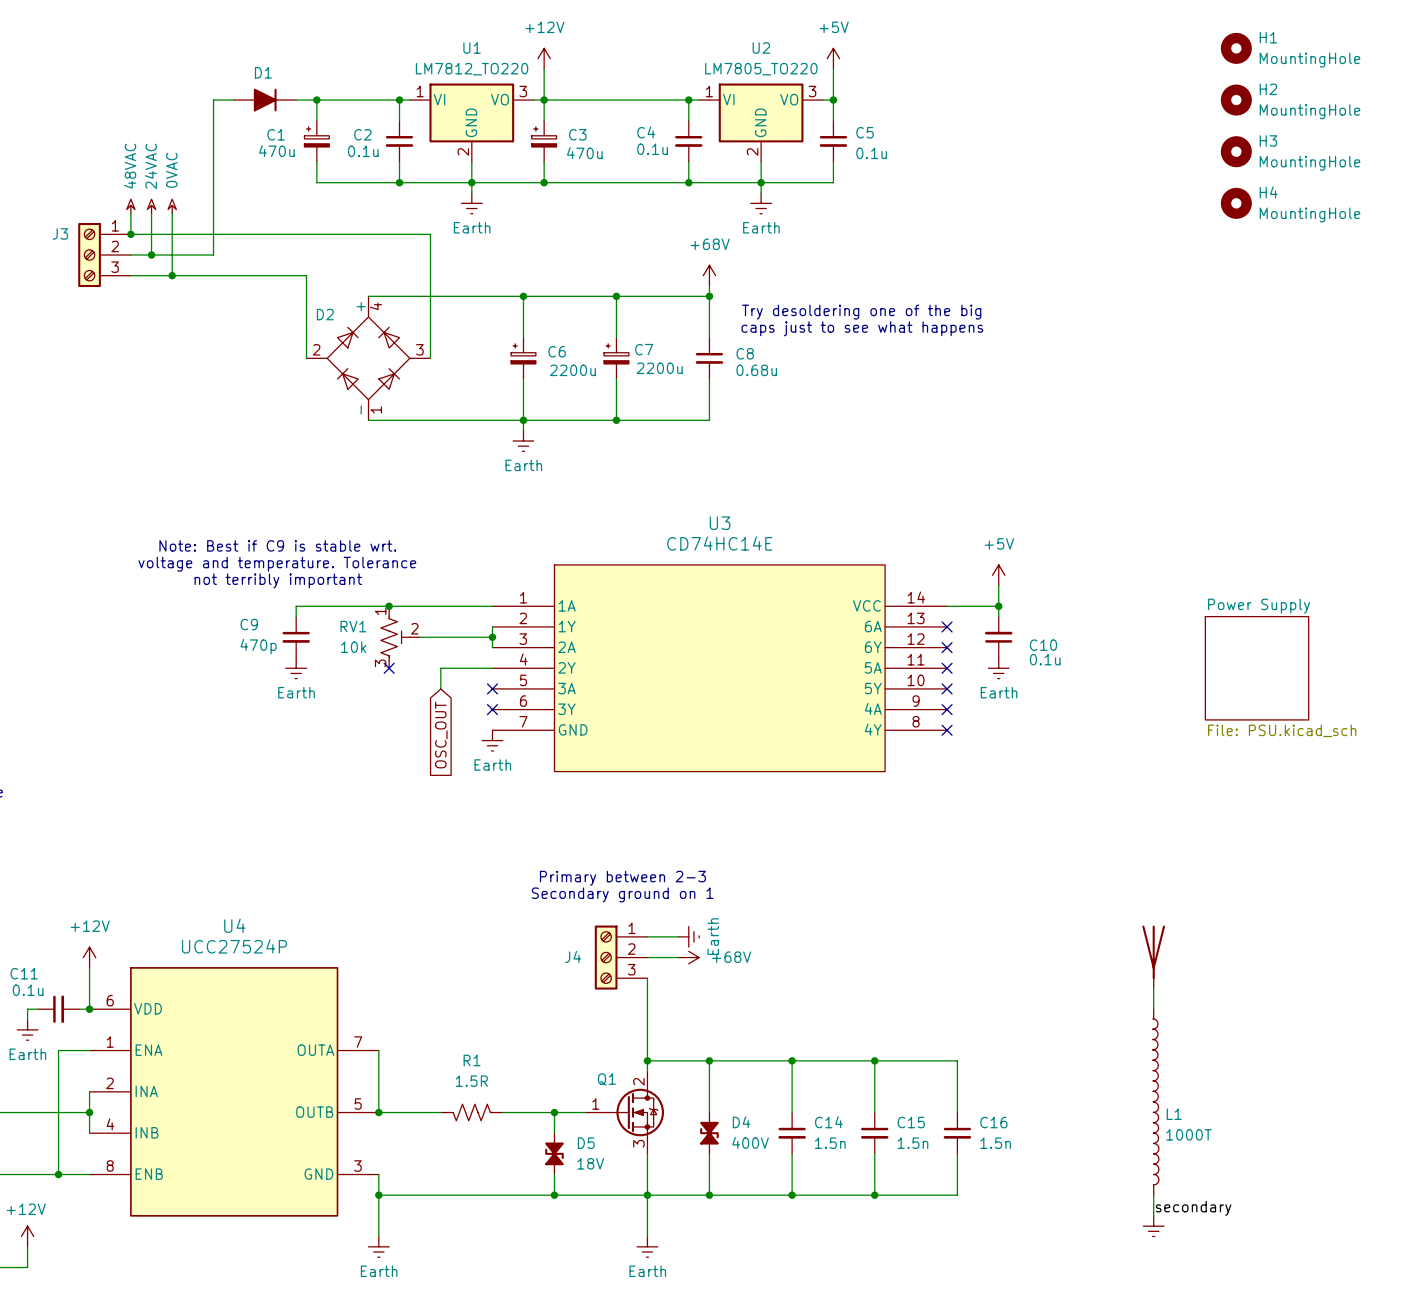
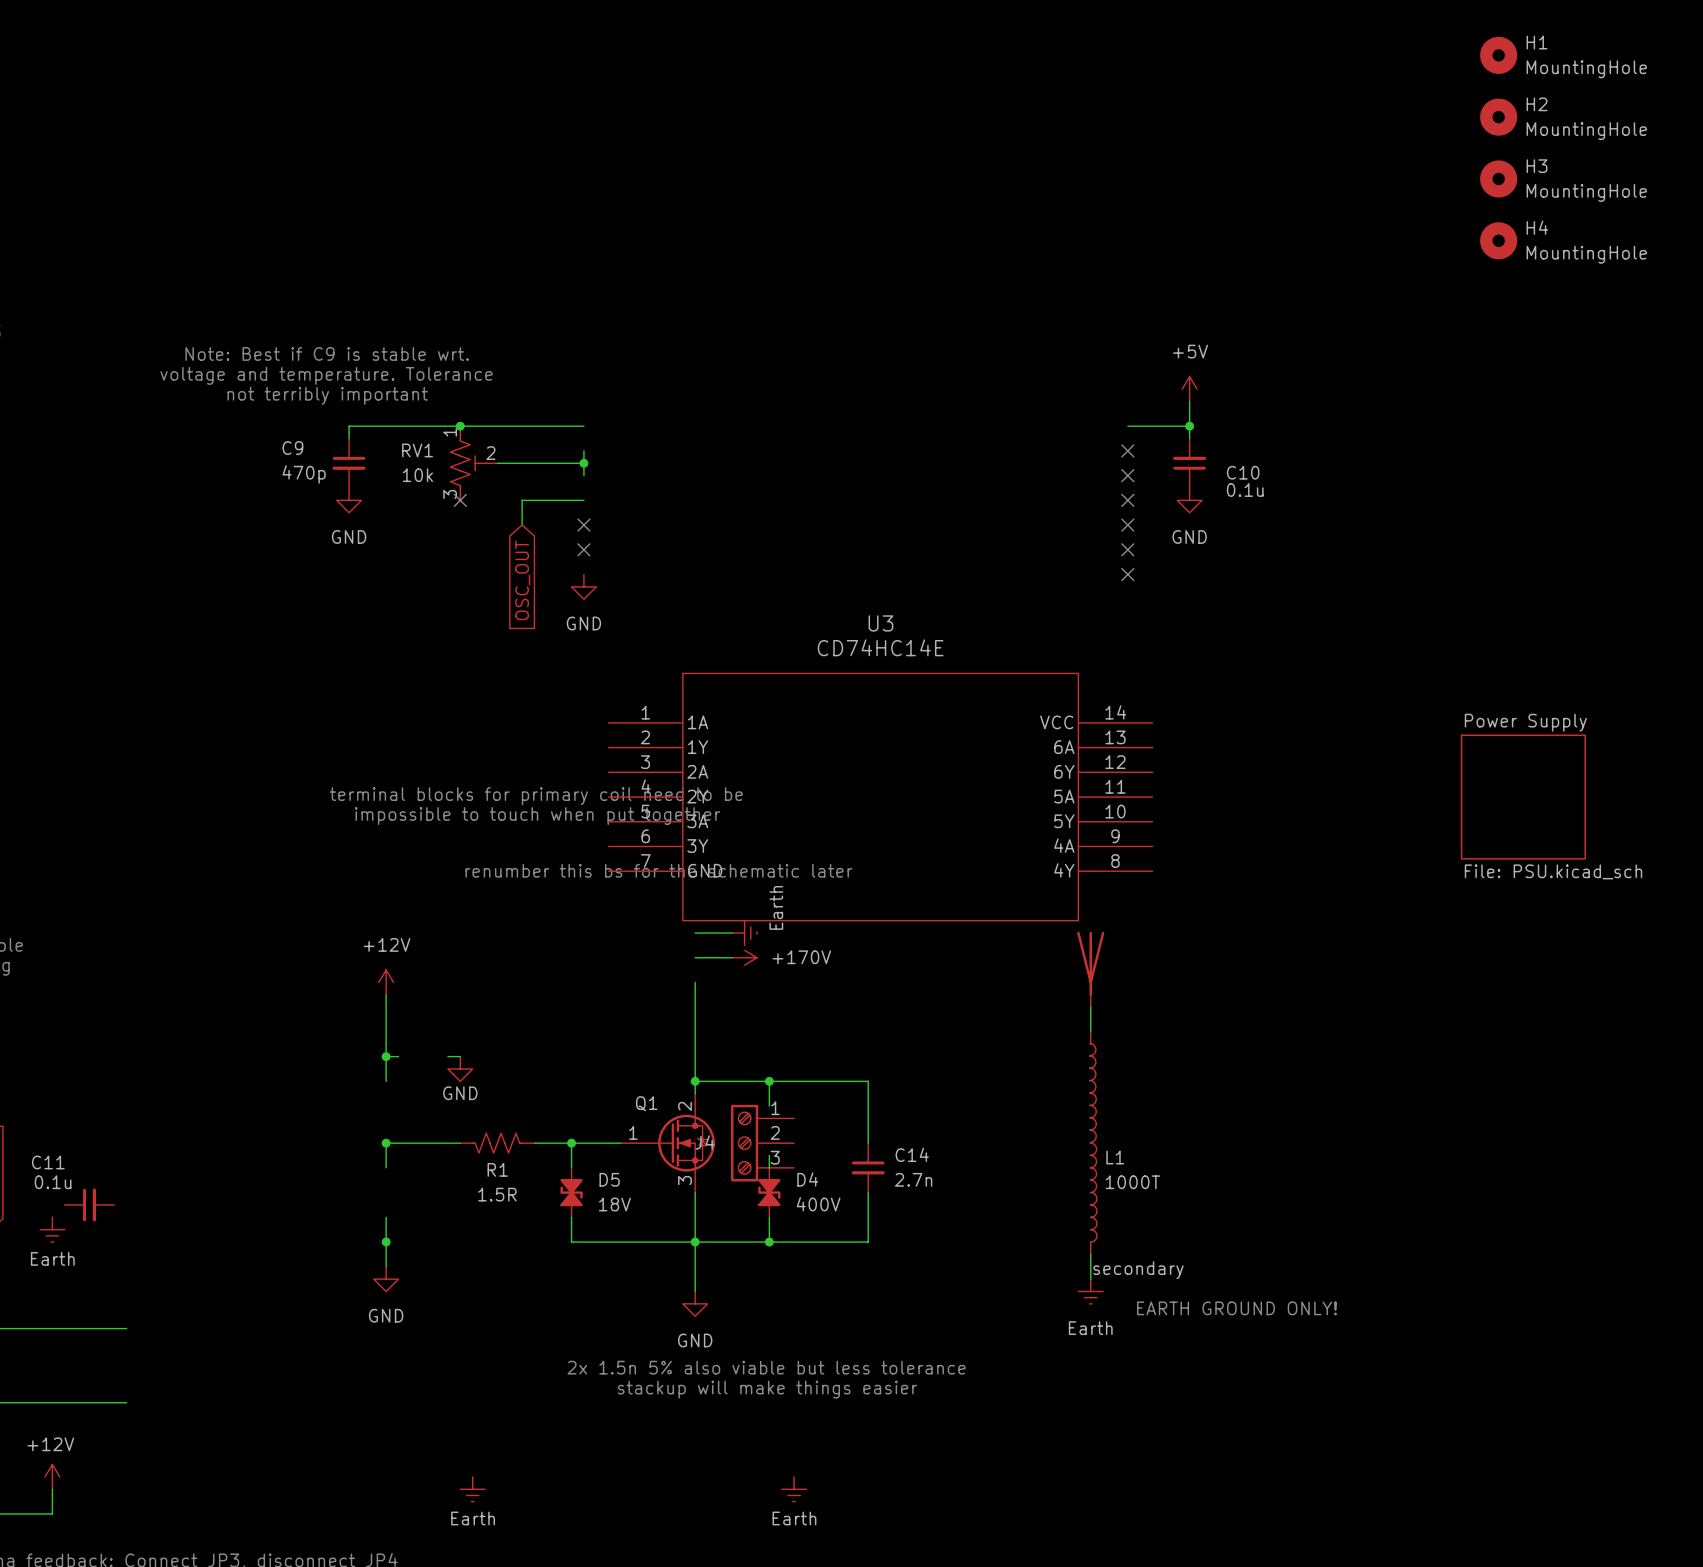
power symbol: +12V (544, 58) -> none
power symbol: +5V (833, 58) -> none
wire: (544, 69) (544, 120) -> none
wire: (833, 69) (833, 120) -> none
wire: (234, 100) (213, 100) (213, 255) (130, 255) -> none
D1: (265, 100) -> none
wire: (296, 100) (409, 100) -> none
wire: (316, 100) (316, 120) -> none
junction: (316, 100) -> none
wire: (399, 100) (399, 120) -> none
junction: (399, 100) -> none
wire: (533, 100) (699, 100) -> none
junction: (544, 100) -> none
wire: (688, 100) (688, 120) -> none
junction: (688, 100) -> none
wire: (823, 100) (833, 100) -> none
junction: (833, 100) -> none
U1: LM7812_TO220 (471, 122) -> none
U2: LM7805_TO220 (761, 122) -> none
C1: 470u (316, 141) -> none
C2: 0.1u (399, 141) -> none
C3: 470u (544, 141) -> none
C4: 0.1u (688, 141) -> none
C5: 0.1u (833, 141) -> none
wire: (316, 162) (316, 182) (833, 182) (833, 162) -> none
wire: (399, 162) (399, 182) -> none
wire: (471, 162) (471, 193) -> none
wire: (544, 162) (544, 182) -> none
wire: (688, 162) (688, 182) -> none
wire: (761, 162) (761, 193) -> none
junction: (399, 182) -> none
junction: (471, 182) -> none
junction: (544, 182) -> none
junction: (688, 182) -> none
junction: (761, 182) -> none
power symbol: Earth (471, 203) -> none
power symbol: Earth (761, 203) -> none
power symbol: 48VAC (130, 206) -> none
power symbol: 24VAC (151, 206) -> none
power symbol: 0VAC (172, 206) -> none
wire: (130, 213) (130, 234) (430, 234) (430, 358) -> none
wire: (151, 213) (151, 255) -> none
wire: (172, 213) (172, 275) -> none
junction: (130, 234) -> none
J3: (104, 255) -> none
junction: (151, 255) -> none
wire: (130, 275) (306, 275) (306, 358) -> none
junction: (172, 275) -> none
power symbol: +68V (709, 275) -> none
wire: (709, 286) (709, 337) -> none
wire: (368, 296) (709, 296) -> none
wire: (523, 296) (523, 337) -> none
junction: (523, 296) -> none
wire: (616, 296) (616, 337) -> none
junction: (616, 296) -> none
junction: (709, 296) -> none
text: none -> Note: Best if C9 is stable wrt. (327, 353)
text: Try desoldering one of the big (861, 312) -> none
text: none -> voltage and temperature. Tolerance (326, 375)
power symbol: none -> +5V (1189, 389)
text: caps just to see what happens (862, 328) -> none
text: none -> not terribly important (327, 395)
wire: none -> (1189, 401) (1189, 438)
junction: none -> (460, 426)
D2: (368, 358) -> none
wire: none -> (583, 426) (349, 426) (349, 438)
C6: 2200u (523, 358) -> none
C7: 2200u (616, 358) -> none
C8: 0.68u (709, 358) -> none
wire: none -> (1127, 426) (1189, 426)
junction: none -> (1189, 426)
wire: none -> (583, 450) (583, 475)
wire: (523, 378) (523, 430) -> none
wire: (616, 378) (616, 420) -> none
wire: (709, 378) (709, 420) (471, 420) -> none
no-connect mark: none -> (1127, 450)
wire: none -> (497, 463) (583, 463)
junction: none -> (583, 463)
no-connect mark: none -> (1127, 475)
power symbol: none -> GND (349, 500)
wire: (368, 420) (420, 420) -> (522, 525) (522, 500)
no-connect mark: none -> (460, 500)
junction: (523, 420) -> none
junction: (616, 420) -> none
no-connect mark: none -> (1127, 500)
power symbol: none -> GND (1189, 500)
no-connect mark: none -> (583, 525)
power symbol: Earth (523, 440) -> none
no-connect mark: none -> (1127, 525)
no-connect mark: none -> (583, 549)
no-connect mark: none -> (1127, 549)
no-connect mark: none -> (1127, 574)
global label: none -> OSC_OUT (522, 580)
power symbol: none -> GND (583, 586)
text: Note: Best if C9 is stable wrt. (277, 545) -> none
text: voltage and temperature. Tolerance (277, 564) -> none
power symbol: +5V (998, 575) -> none
text: not terribly important (278, 580) -> none
wire: (998, 585) (998, 616) -> none
junction: (389, 606) -> none
wire: (492, 606) (296, 606) (296, 616) -> none
wire: (947, 606) (998, 606) -> none
junction: (998, 606) -> none
wire: (492, 626) (492, 647) -> none
no-connect mark: (947, 626) -> none
C9 position: (296, 637) -> (349, 463)
RV1 position: (400, 637) -> (473, 463)
wire: (420, 637) (492, 637) -> none
junction: (492, 637) -> none
C10 position: (998, 637) -> (1189, 463)
no-connect mark: (947, 647) -> none
text: none -> terminal blocks for primary coil need to be (536, 796)
power symbol: Earth (296, 668) -> none
no-connect mark: (389, 668) -> none
wire: (492, 668) (440, 668) (440, 688) -> none
no-connect mark: (947, 668) -> none
power symbol: Earth (998, 668) -> none
text: none -> impossible to touch when put together (537, 816)
no-connect mark: (492, 688) -> none
no-connect mark: (947, 688) -> none
no-connect mark: (492, 709) -> none
no-connect mark: (947, 709) -> none
text: none -> renumber this bs for the schematic later (658, 870)
no-connect mark: (947, 730) -> none
global label: OSC_OUT (441, 735) -> none
power symbol: Earth (492, 740) -> none
power symbol: none -> Earth (744, 933)
power symbol: none -> +170V (744, 957)
part: none -> (1090, 969)
power symbol: none -> +12V (386, 982)
wire: none -> (386, 994) (386, 1081)
wire: none -> (1090, 1007) (1090, 1031)
text: Primary between 2-3 (622, 878) -> none
wire: none -> (386, 1056) (398, 1056)
junction: none -> (386, 1056)
wire: none -> (447, 1056) (460, 1056)
text: Secondary ground on 1 (622, 894) -> none
power symbol: none -> GND (460, 1068)
wire: none -> (695, 1081) (868, 1081) (868, 1143)
junction: none -> (695, 1081)
wire: none -> (769, 1081) (769, 1106)
junction: none -> (769, 1081)
wire: (647, 936) (678, 936) -> (695, 933) (732, 933)
power symbol: Earth (688, 936) -> none
power symbol: +12V (89, 957) -> none
junction: none -> (386, 1143)
wire: none -> (460, 1143) (386, 1143) (386, 1167)
wire: none -> (534, 1143) (621, 1143)
wire: none -> (571, 1143) (571, 1167)
junction: none -> (571, 1143)
wire: (647, 957) (678, 957) -> (695, 957) (732, 957)
power symbol: +68V (688, 957) -> none
part: (1153, 957) -> none
wire: (89, 967) (89, 1009) (79, 1009) -> none
wire: none -> (769, 1155) (769, 1167)
wire: (647, 978) (647, 1071) -> (695, 982) (695, 1093)
wire: (1153, 988) (1153, 1009) -> none
wire: none -> (868, 1192) (868, 1242) (571, 1242) (571, 1217)
wire: (37, 1009) (27, 1009) (27, 1019) -> none
junction: (89, 1009) -> none
junction: none -> (386, 1242)
junction: none -> (695, 1242)
wire: (89, 1050) (58, 1050) (58, 1174) -> none
wire: (378, 1050) (378, 1112) (440, 1112) -> none
wire: none -> (1090, 1254) (1090, 1279)
R1 name position: R1 (472, 1060) -> R1 (497, 1169)
wire: (647, 1060) (957, 1060) (957, 1112) -> none
junction position: (647, 1060) -> (769, 1242)
wire: (709, 1060) (709, 1112) -> none
junction: (709, 1060) -> none
wire: (792, 1060) (792, 1112) -> none
junction: (792, 1060) -> none
wire: (874, 1060) (874, 1112) -> none
junction: (874, 1060) -> none
label: none -> secondary (1138, 1270)
power symbol: none -> GND (386, 1279)
R1 value position: 1.5R (471, 1081) -> 1.5R (497, 1194)
power symbol: none -> Earth (1090, 1291)
wire: (89, 1091) (89, 1133) -> none
U4: UCC27524P (234, 1091) -> none
power symbol: none -> GND (695, 1303)
text: none -> EARTH GROUND ONLY! (1236, 1308)
L1 position: (1155, 1102) -> (1093, 1143)
junction: (89, 1112) -> none
junction: (378, 1112) -> none
R1 position: (471, 1112) -> (497, 1143)
wire: (502, 1112) (585, 1112) -> none
wire: (554, 1112) (554, 1133) -> (769, 1217) (769, 1242)
junction: (554, 1112) -> none
Q1 position: (624, 1112) -> (667, 1143)
D4 position: (709, 1133) -> (769, 1192)
C14 position: (792, 1133) -> (868, 1167)
C15: 1.5n (874, 1133) -> none
C16: 1.5n (957, 1133) -> none
C14 value: 1.5n (830, 1143) -> 2.7n (913, 1179)
text: none -> 2x 1.5n 5% also viable but less tolerance (766, 1367)
D5 position: (554, 1153) -> (571, 1192)
wire: (647, 1153) (647, 1236) -> (695, 1192) (695, 1291)
wire: (709, 1153) (709, 1195) -> none
wire: (792, 1153) (792, 1195) -> none
wire: (874, 1153) (874, 1195) -> none
wire: (957, 1153) (957, 1195) (378, 1195) -> none
text: none -> stackup will make things easier (767, 1389)
junction: (58, 1174) -> none
wire: (378, 1174) (378, 1236) -> none
wire: (554, 1174) (554, 1195) -> none
junction: (378, 1195) -> none
junction: (554, 1195) -> none
junction: (647, 1195) -> none
junction: (709, 1195) -> none
junction: (792, 1195) -> none
junction: (874, 1195) -> none
wire: (1153, 1195) (1153, 1215) -> none
label: secondary (1193, 1208) -> none
power symbol: (1153, 1226) -> none

